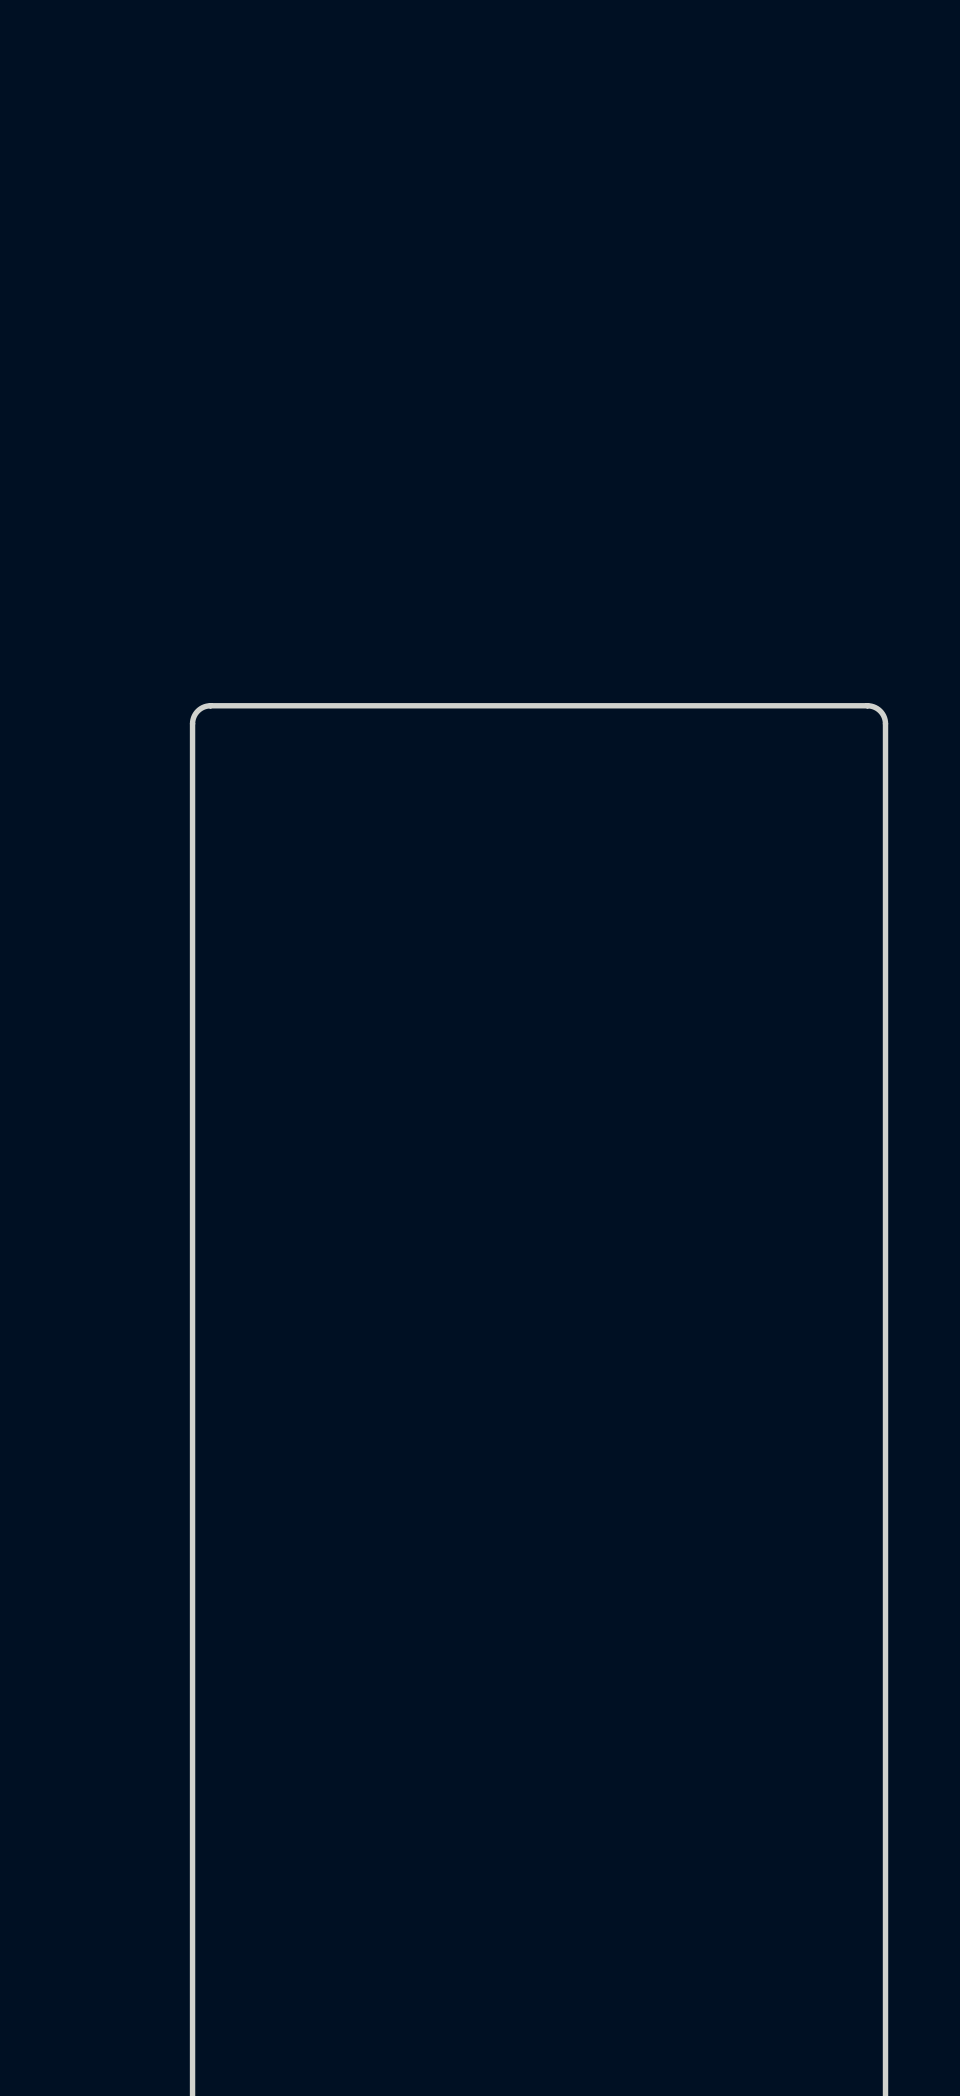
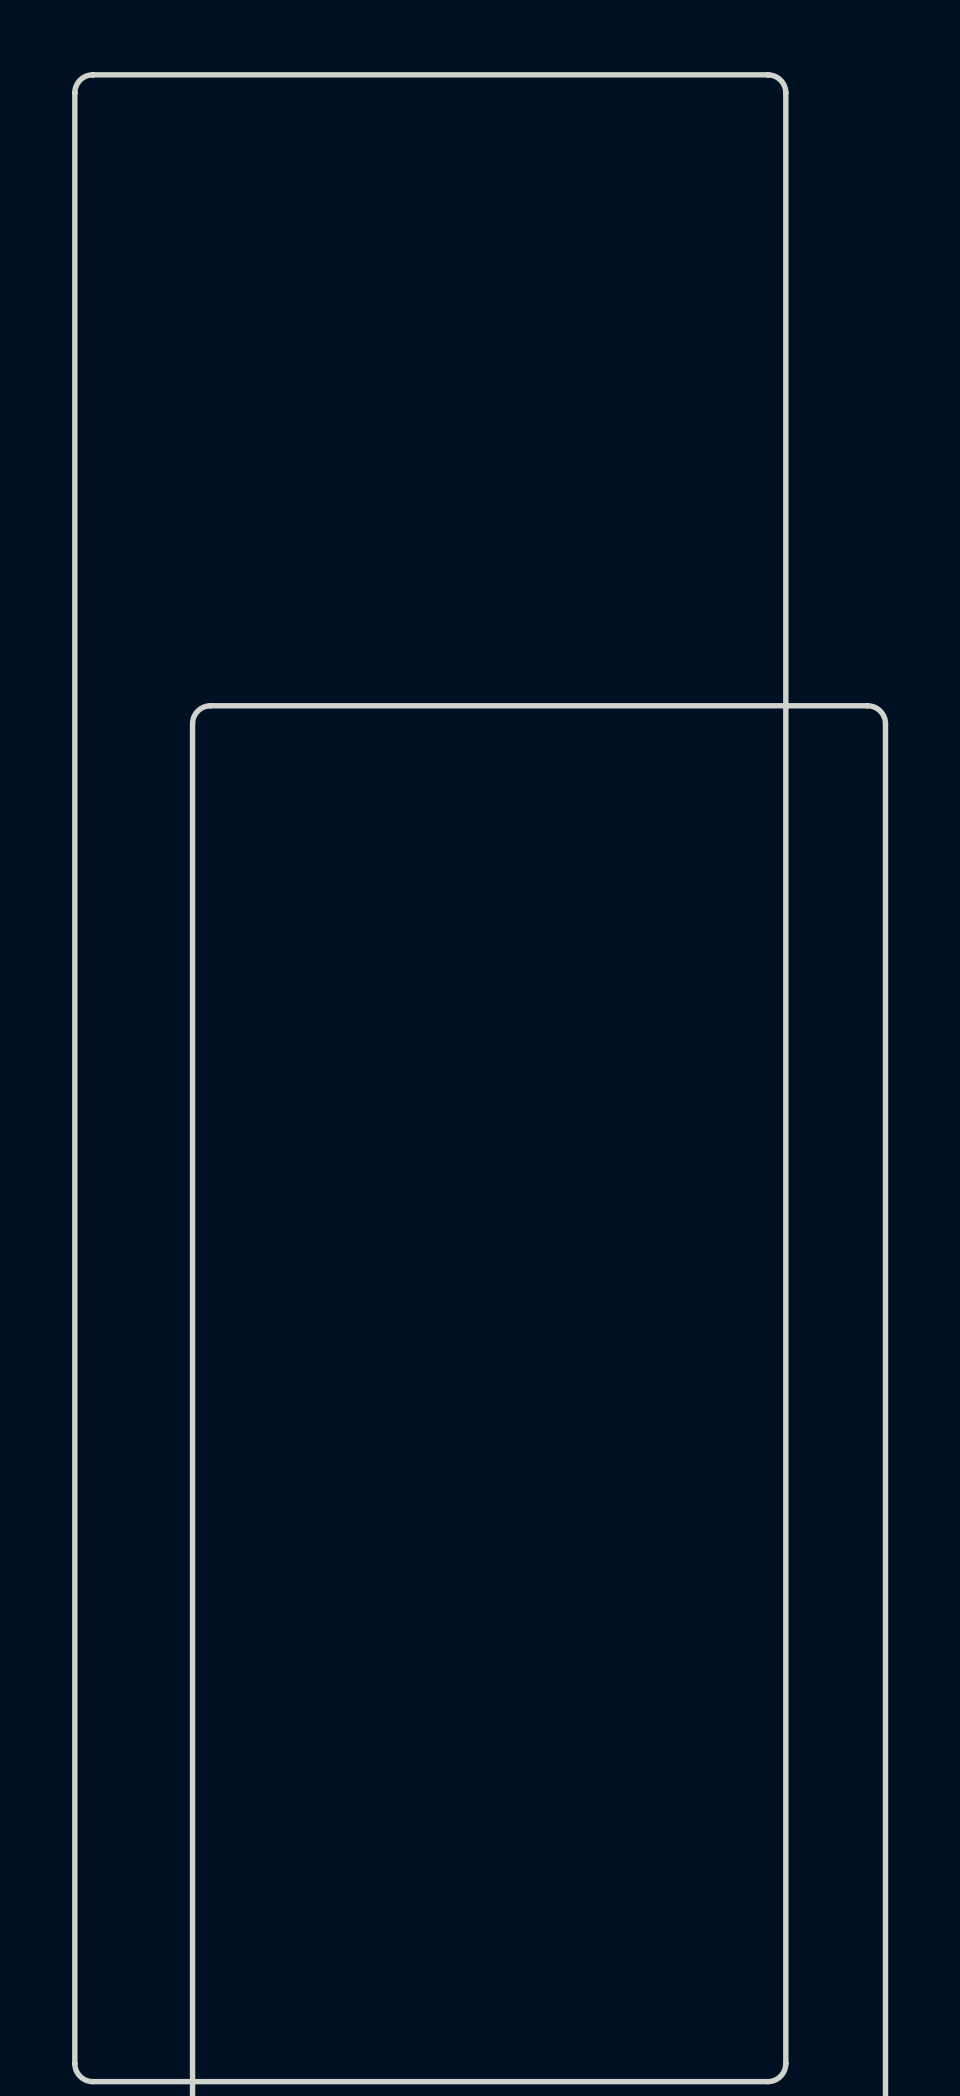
board edge: none -> (767, 74) (92, 74) (81, 78) (75, 86) (74, 2063) (77, 2073) (86, 2080) (767, 2081) (777, 2078) (784, 2069) (785, 92) (780, 80) (767, 74)

